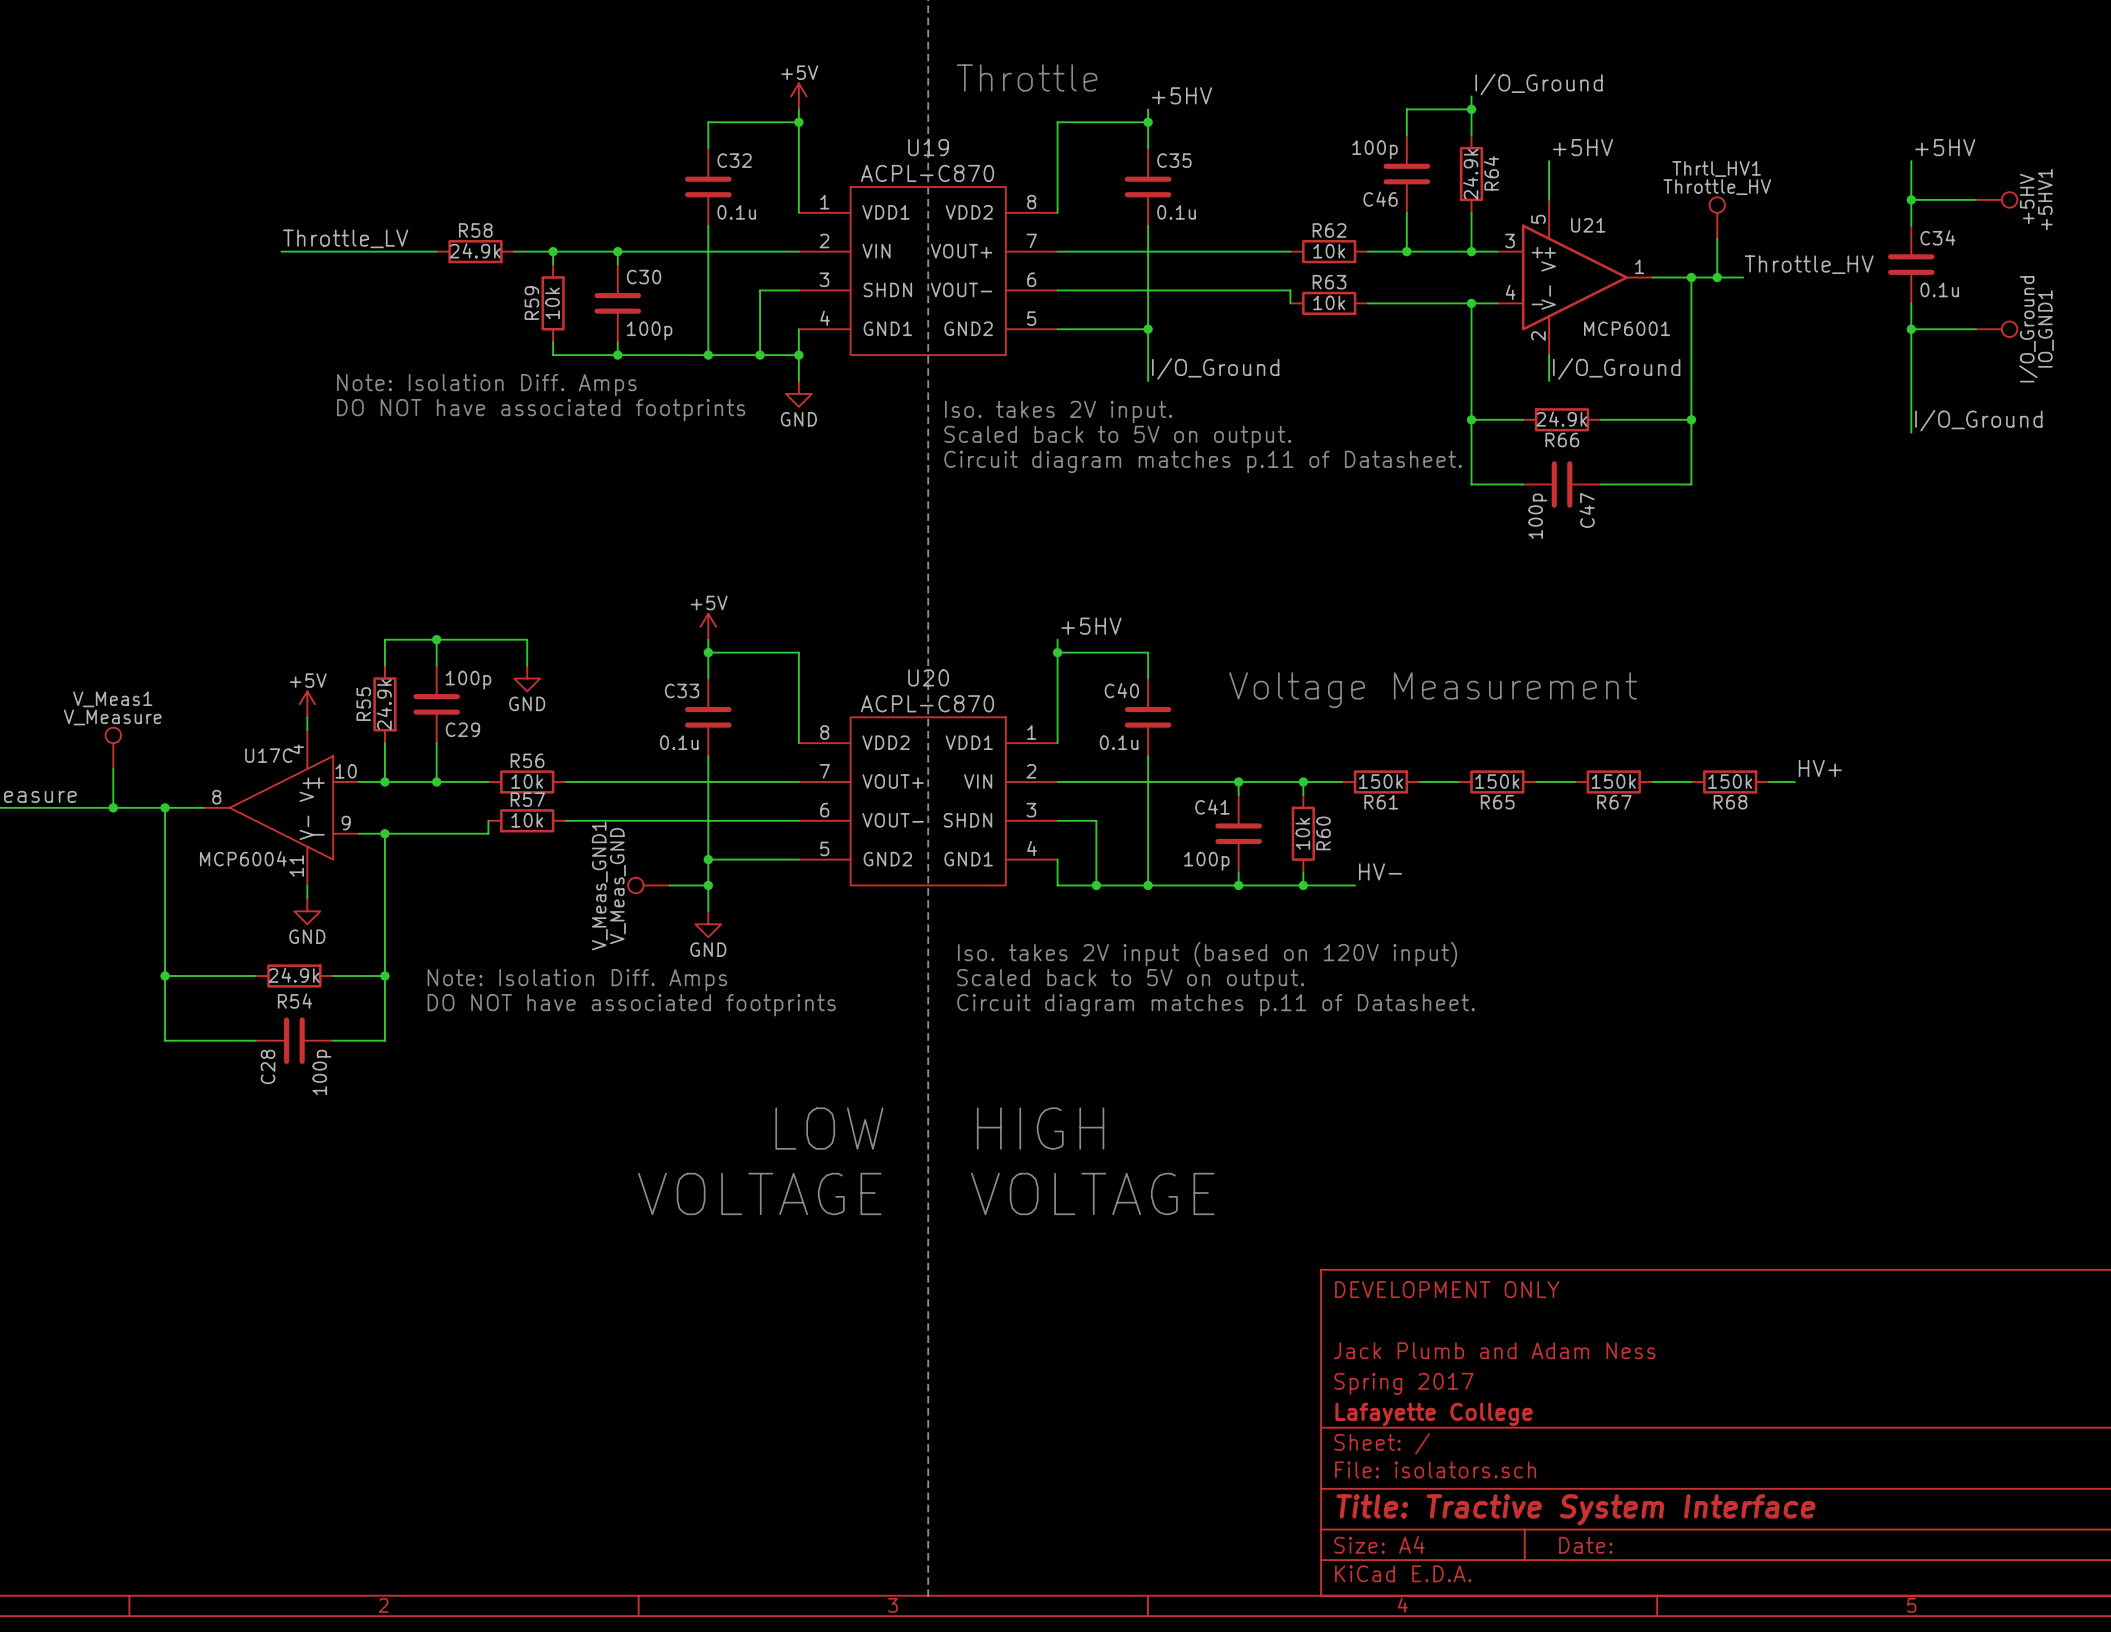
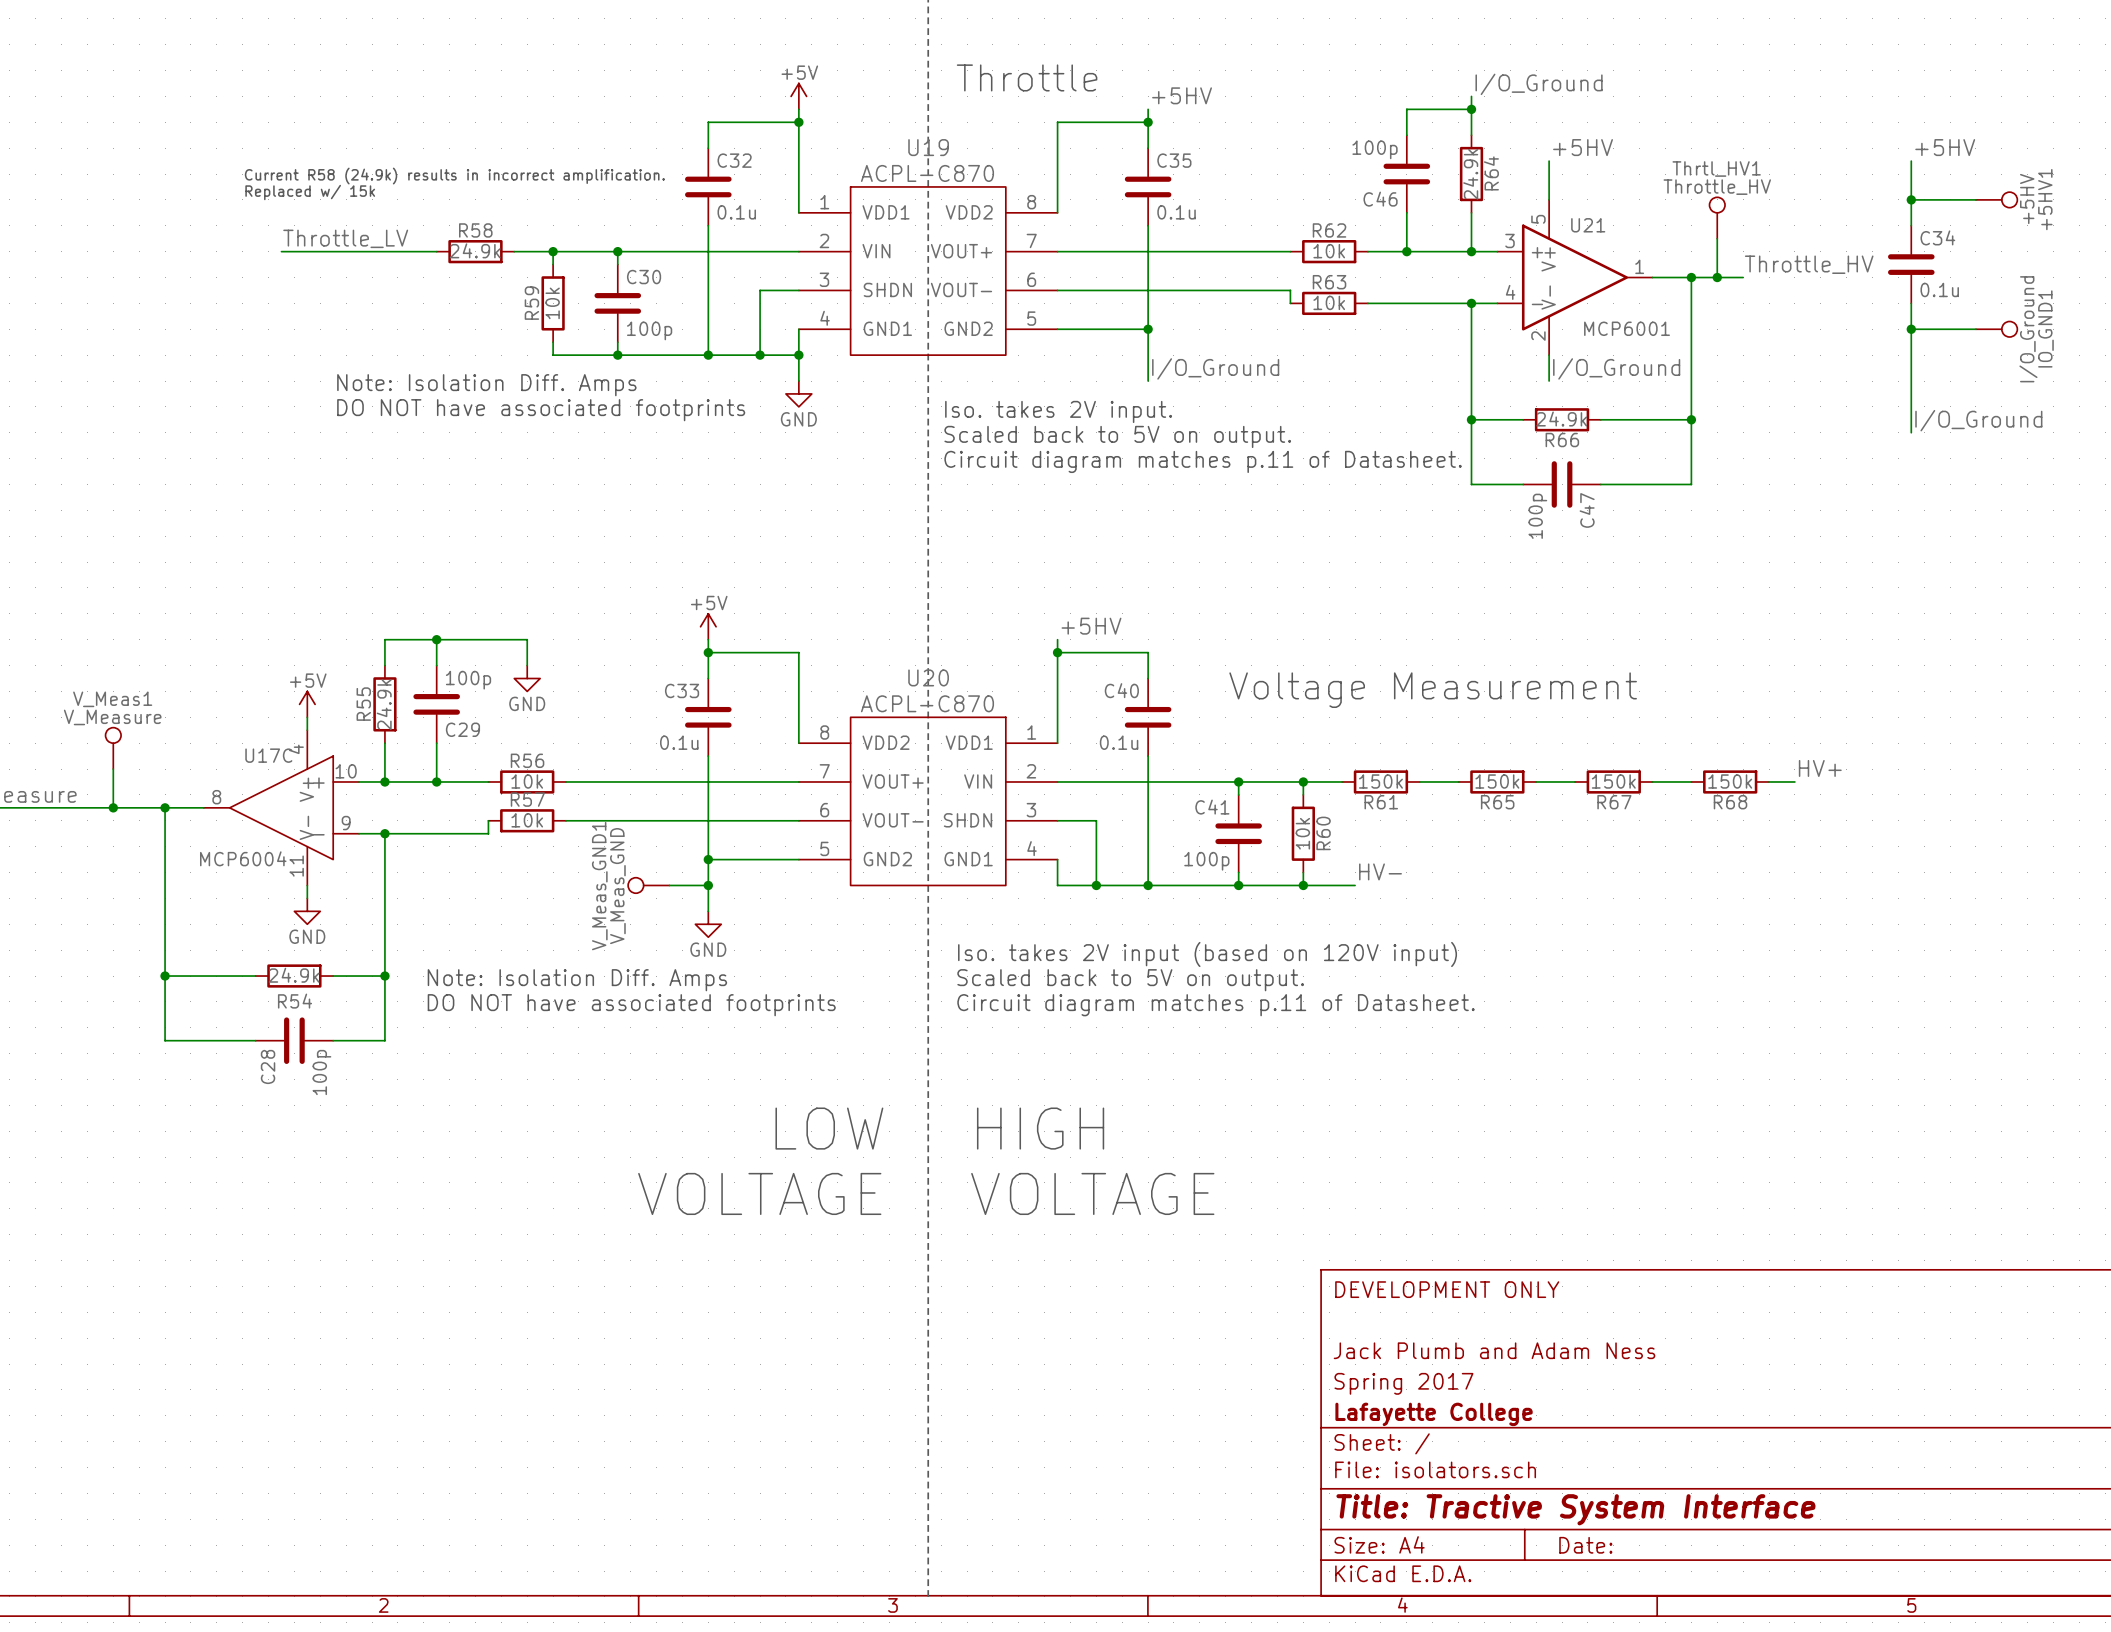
text: none -> Current R58 (24.9k) results in incorrect amplification. (454, 176)
text: none -> Replaced w/ 15k (310, 192)

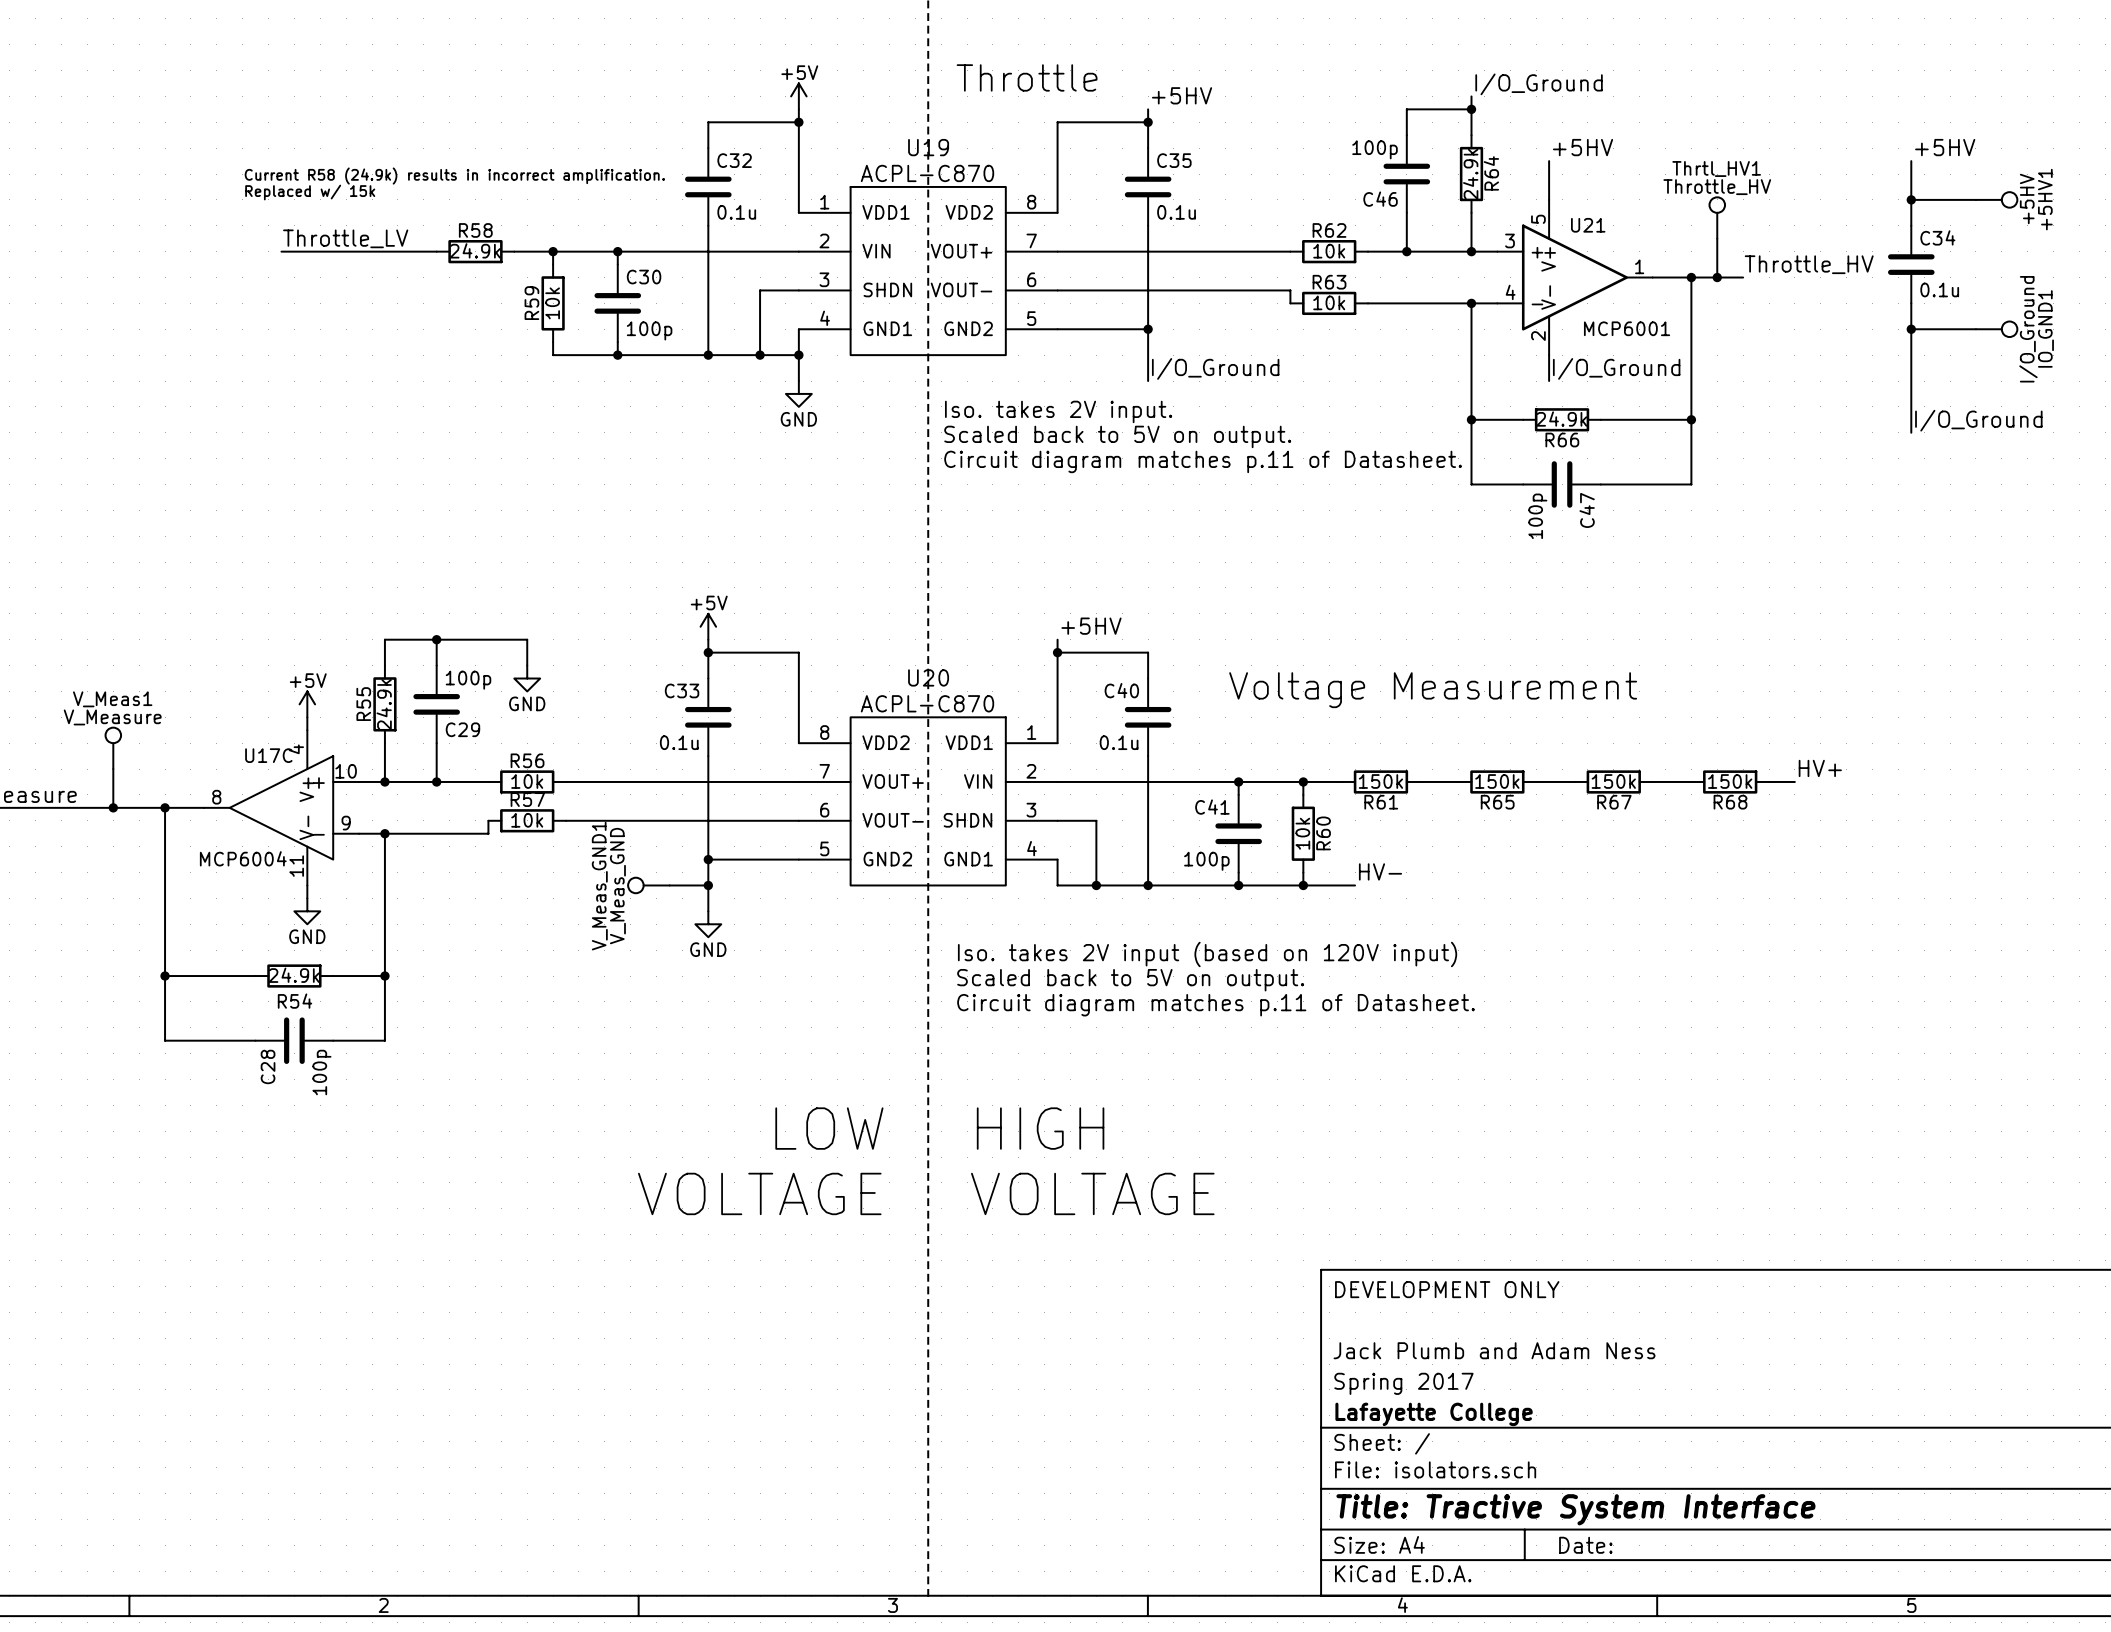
text: Note: Isolation Diff. Amps (486, 385) -> none
text: DO NOT have associated footprints (541, 410) -> none
text: Note: Isolation Diff. Amps (577, 980) -> none
text: DO NOT have associated footprints (631, 1005) -> none

